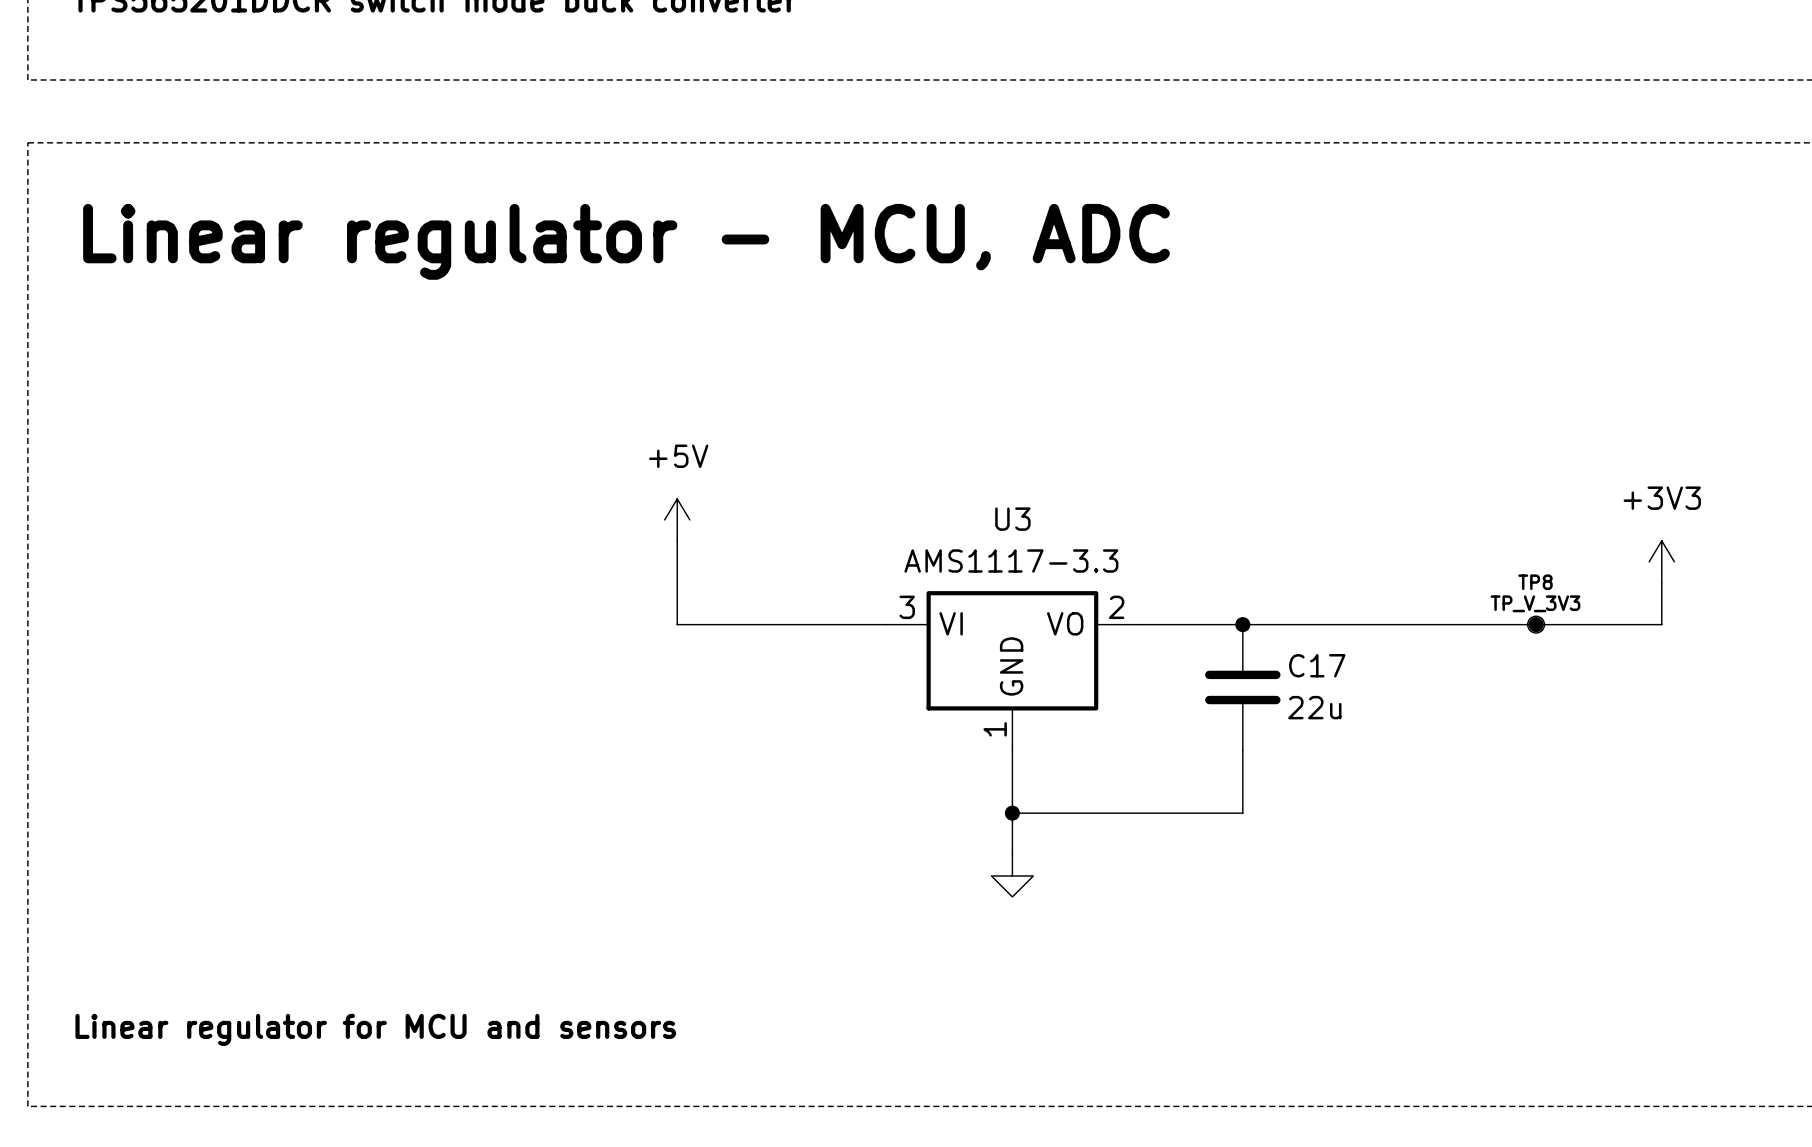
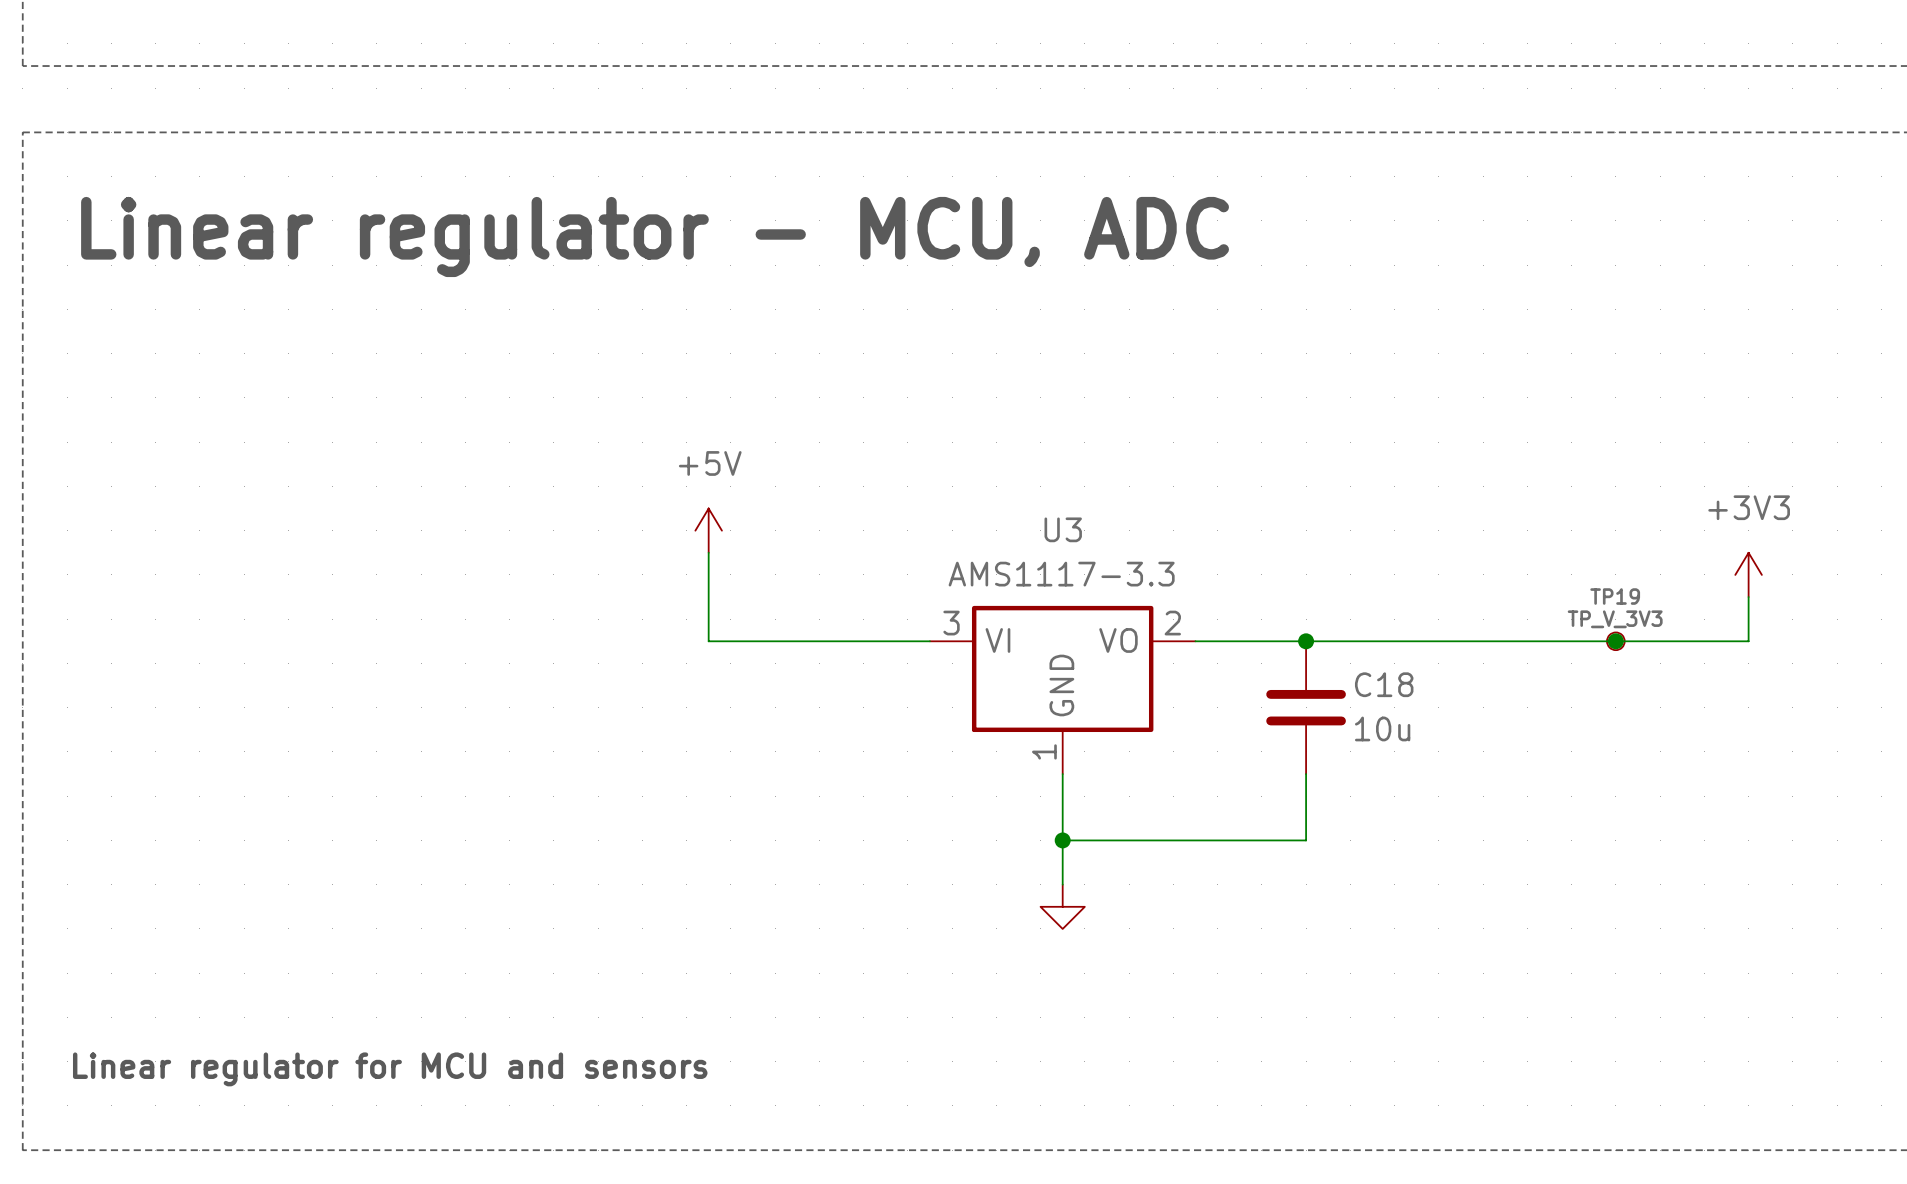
TP8 name: TP8 (1535, 582) -> TP19 (1615, 596)
C17 name: C17 (1317, 665) -> C18 (1384, 684)
C17 value: 22u (1314, 707) -> 10u (1382, 728)

